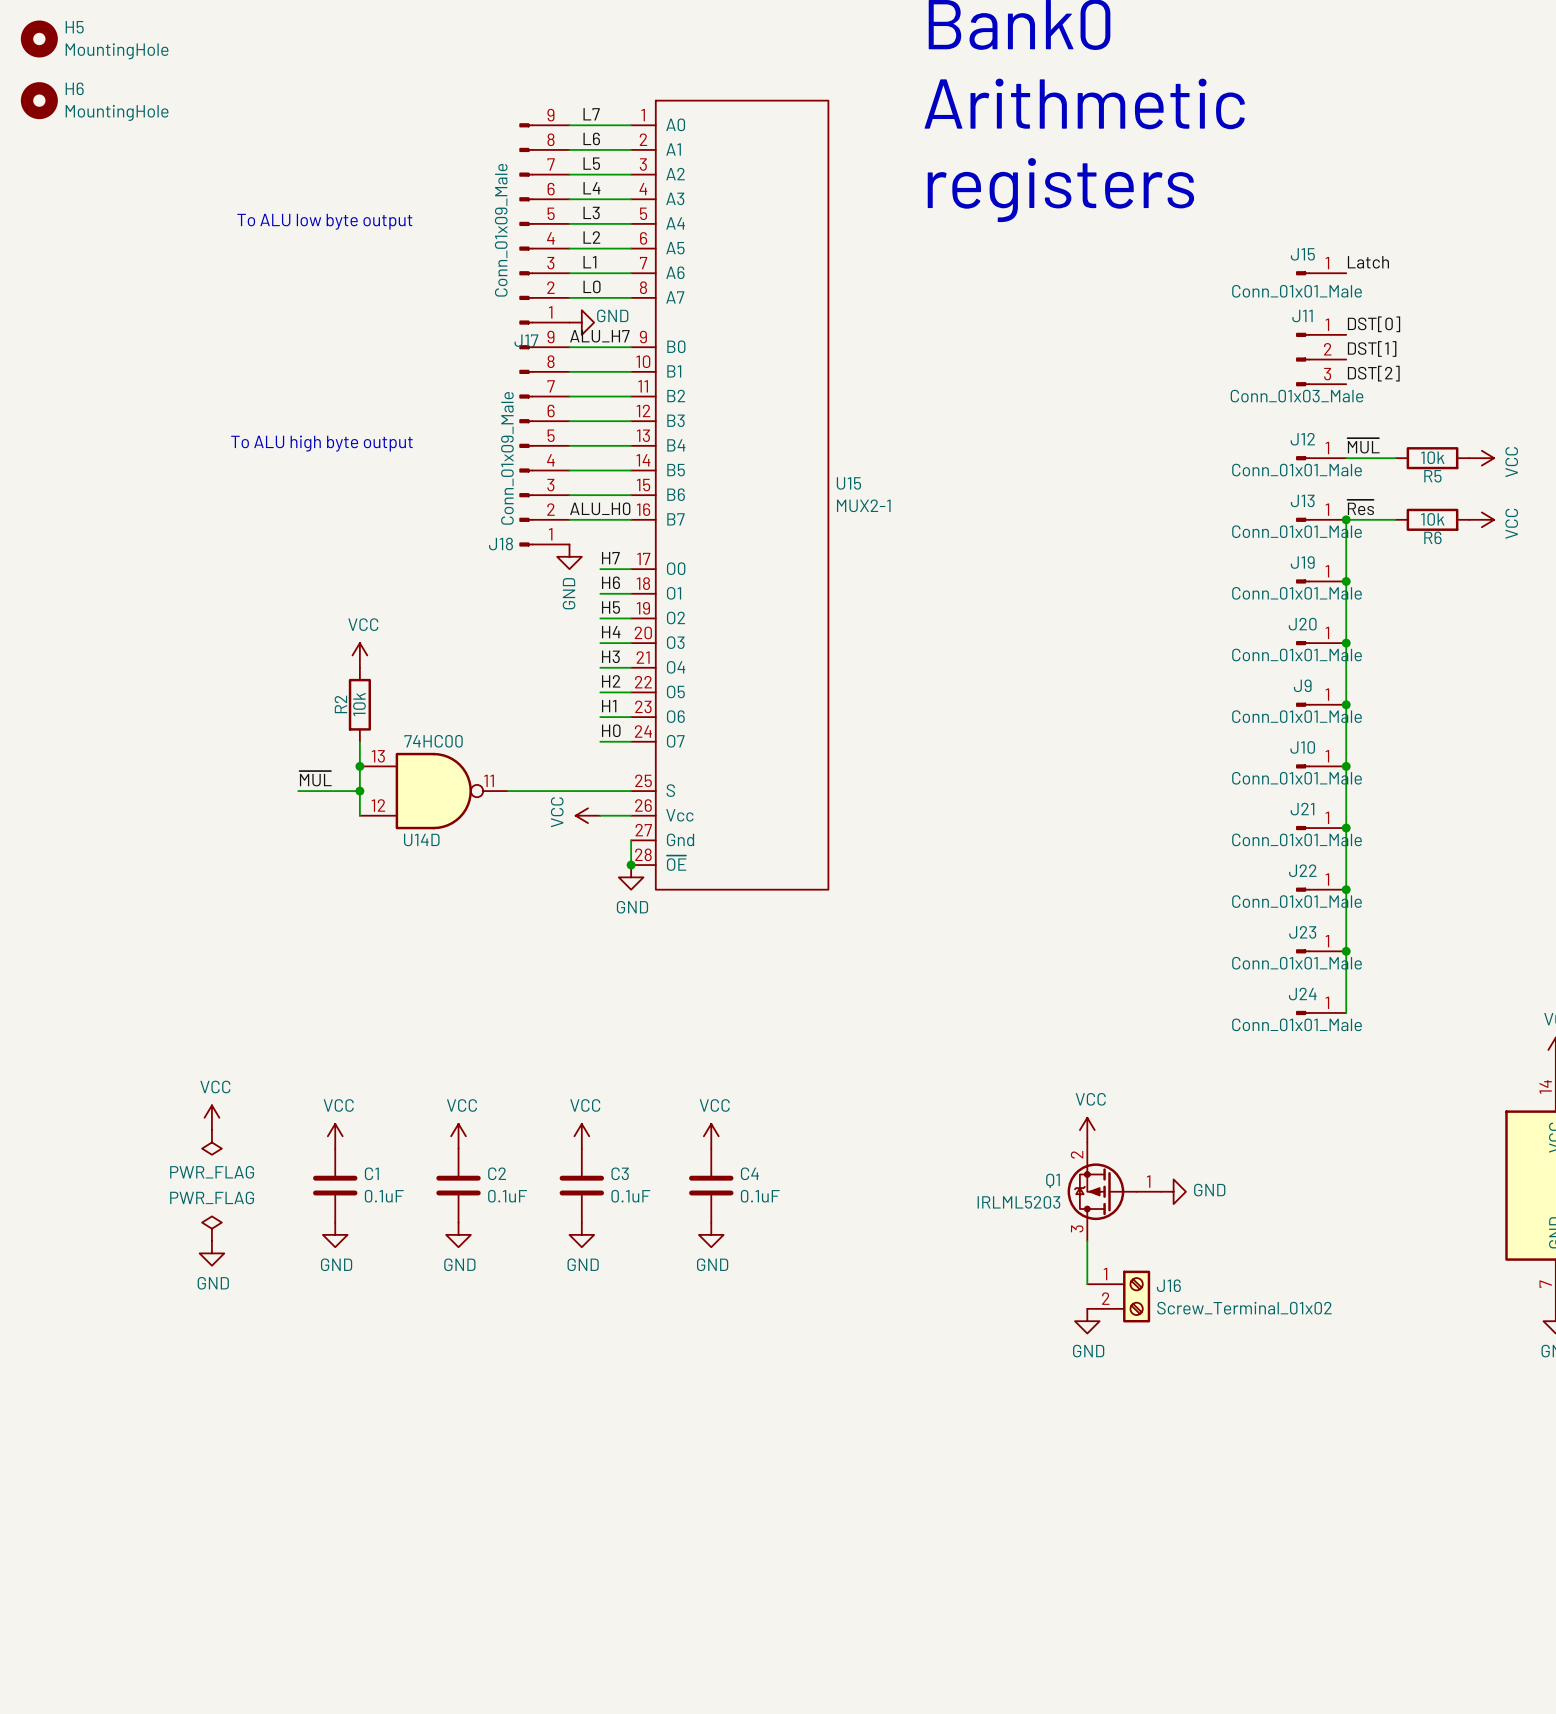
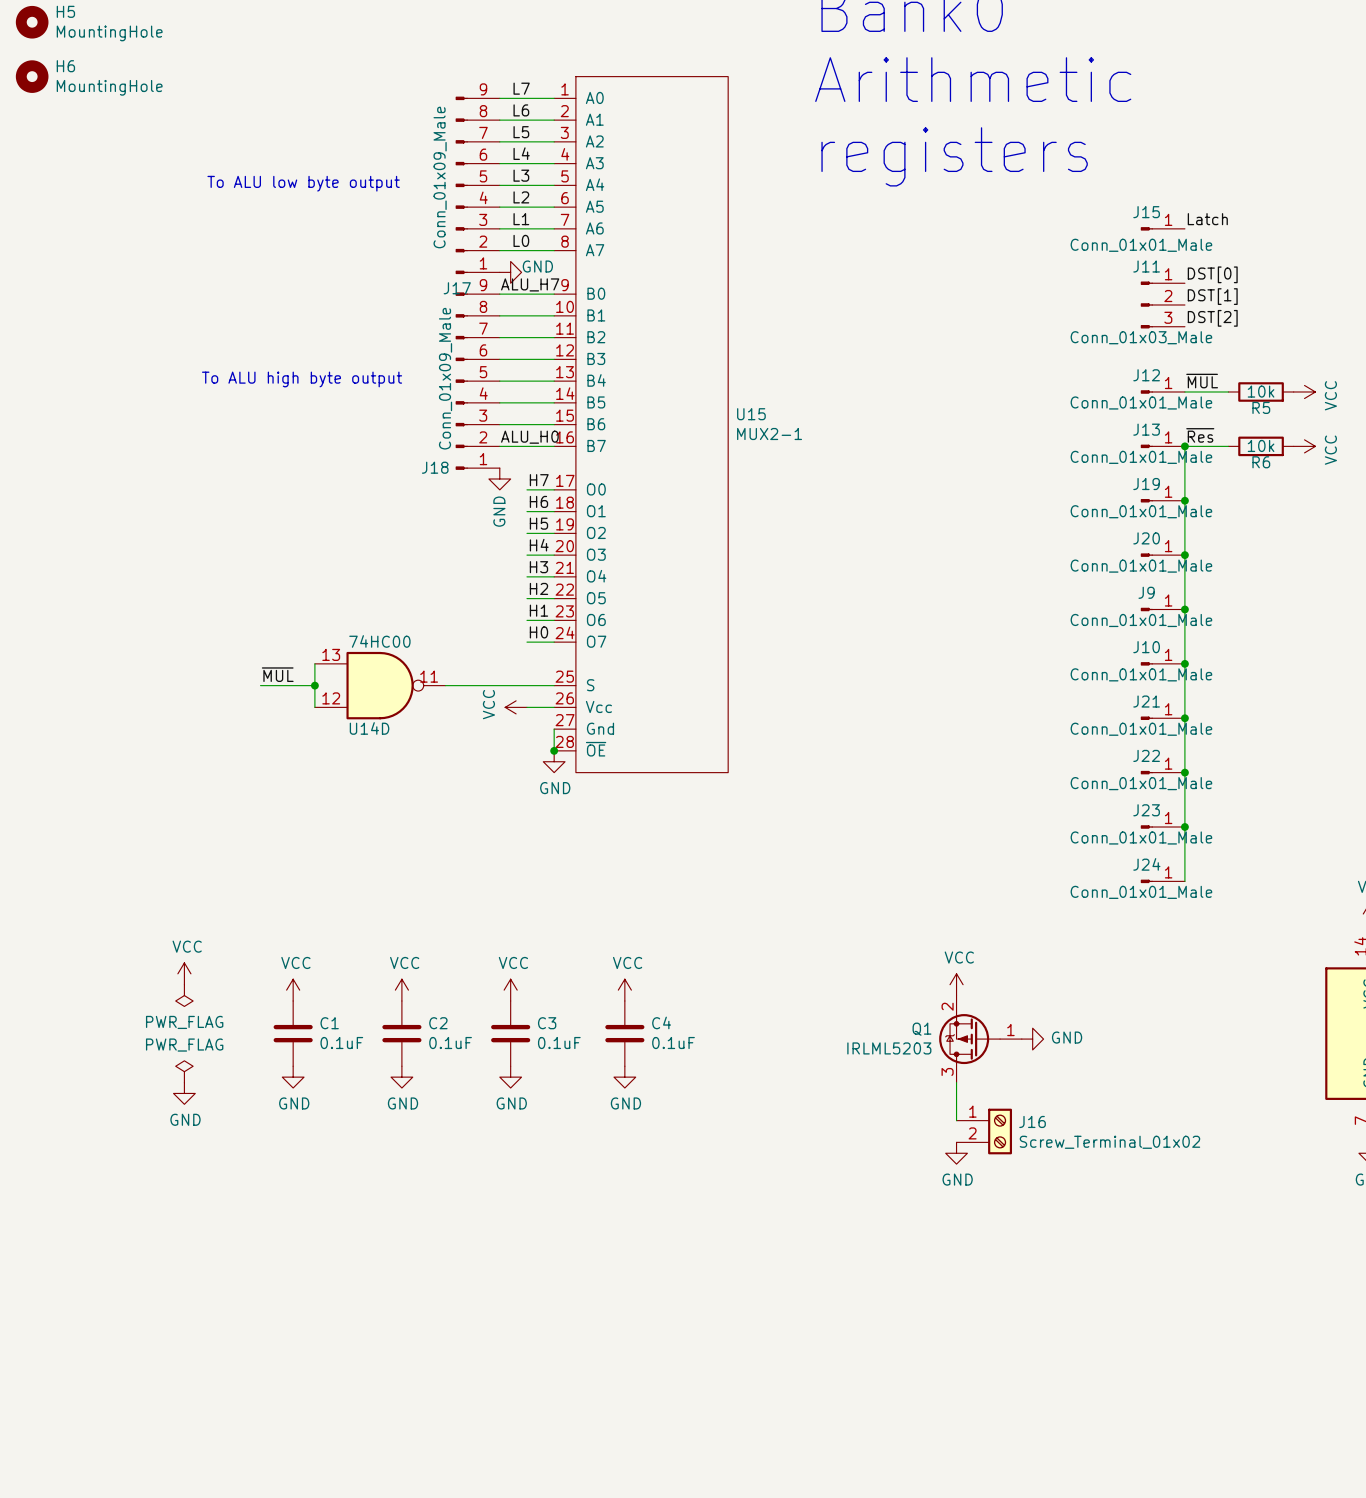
power symbol: VCC (359, 655) -> none
R2: 10k (359, 704) -> none
wire: (359, 741) (359, 766) -> none
junction: (359, 766) -> none

